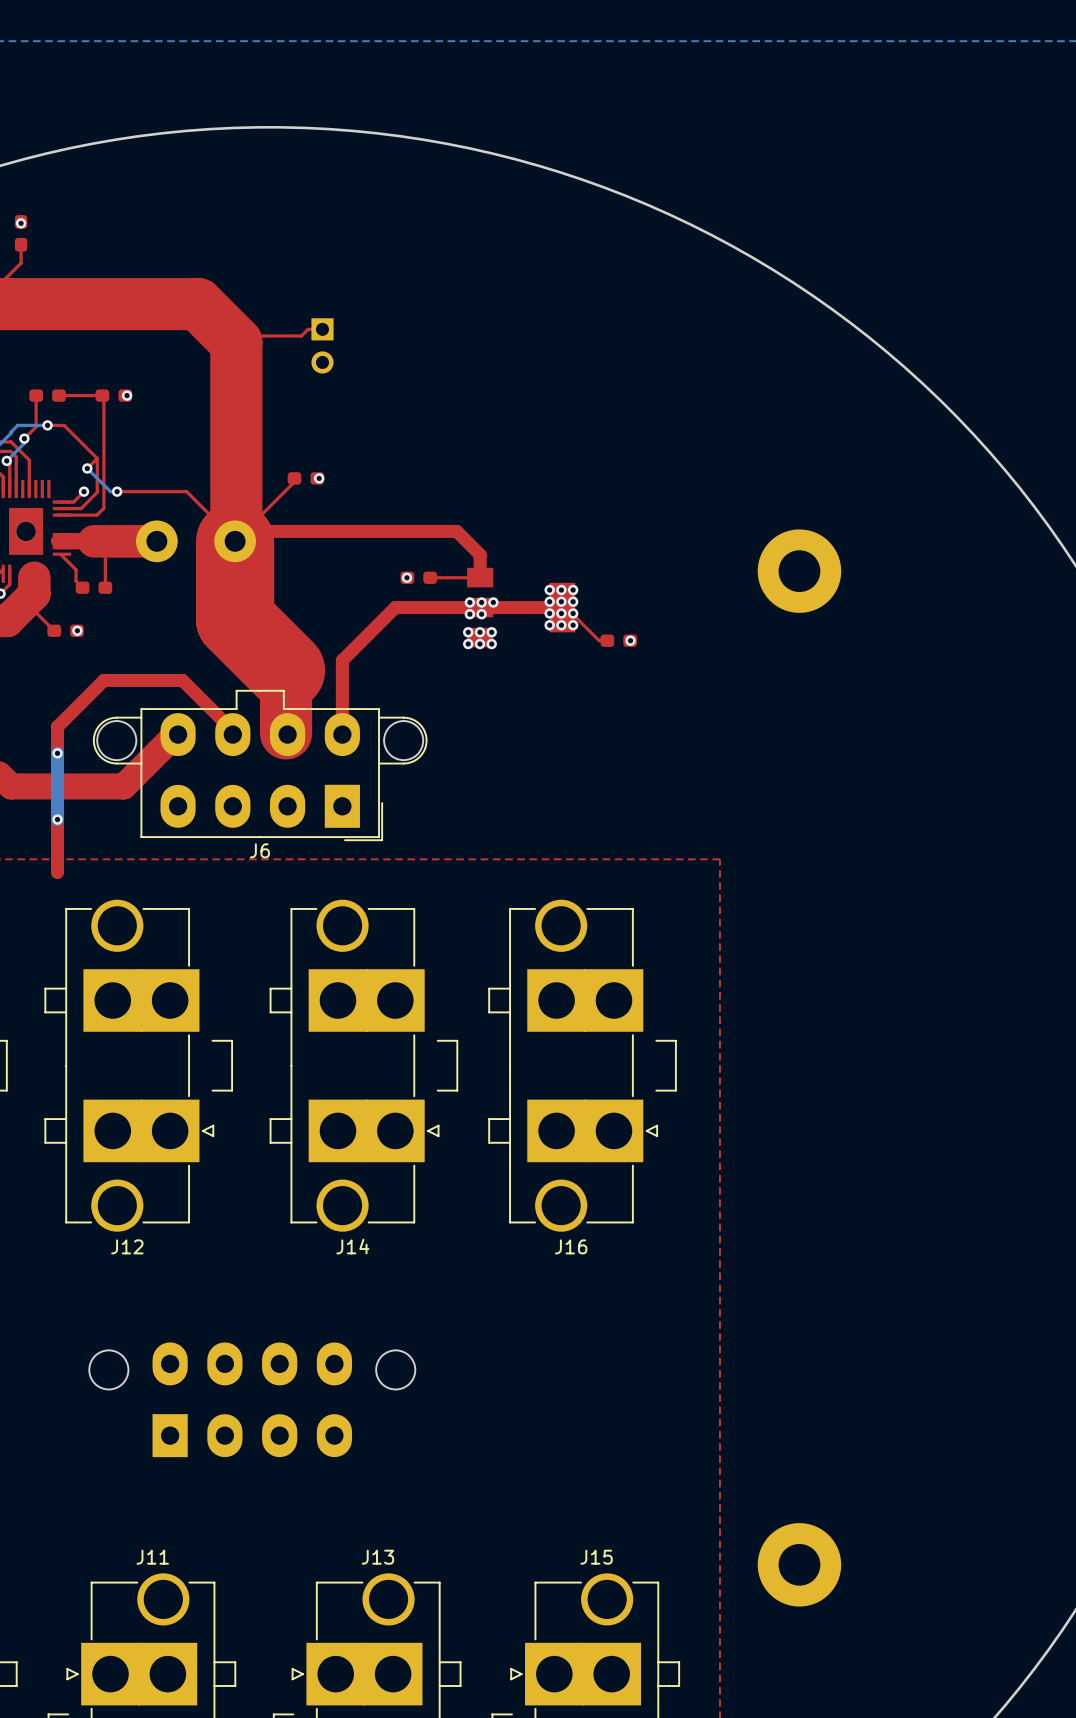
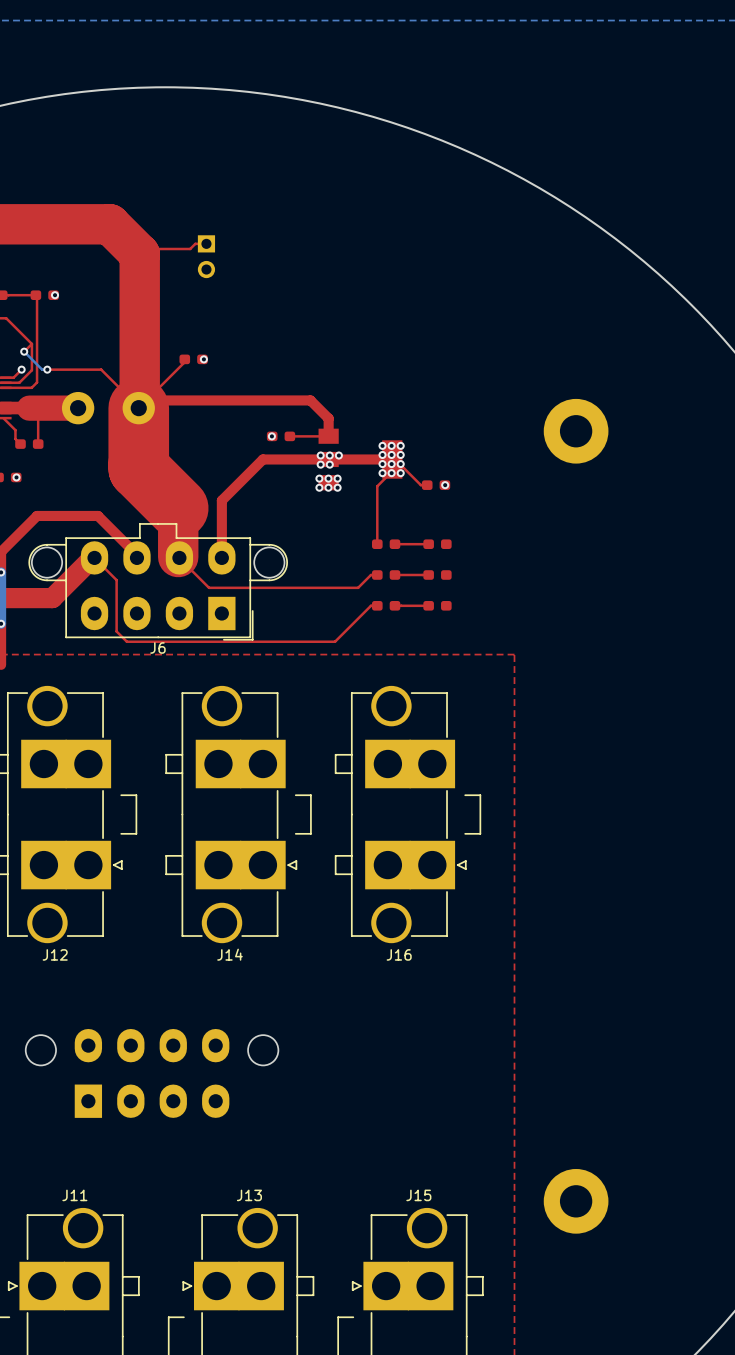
top track: none -> (393, 469) (377, 486) (377, 544)
part: none -> (386, 544)
top track: none -> (428, 544) (396, 544)
part: none -> (437, 544)
top track: none -> (93, 557) (116, 580) (116, 631) (126, 641) (335, 641) (370, 605) (377, 605)
top track: none -> (180, 559) (209, 587) (358, 587) (370, 575) (377, 575)
part: none -> (386, 575)
top track: none -> (428, 575) (393, 575)
part: none -> (437, 575)
part: none -> (386, 605)
top track: none -> (429, 605) (394, 605)
part: none -> (437, 605)

